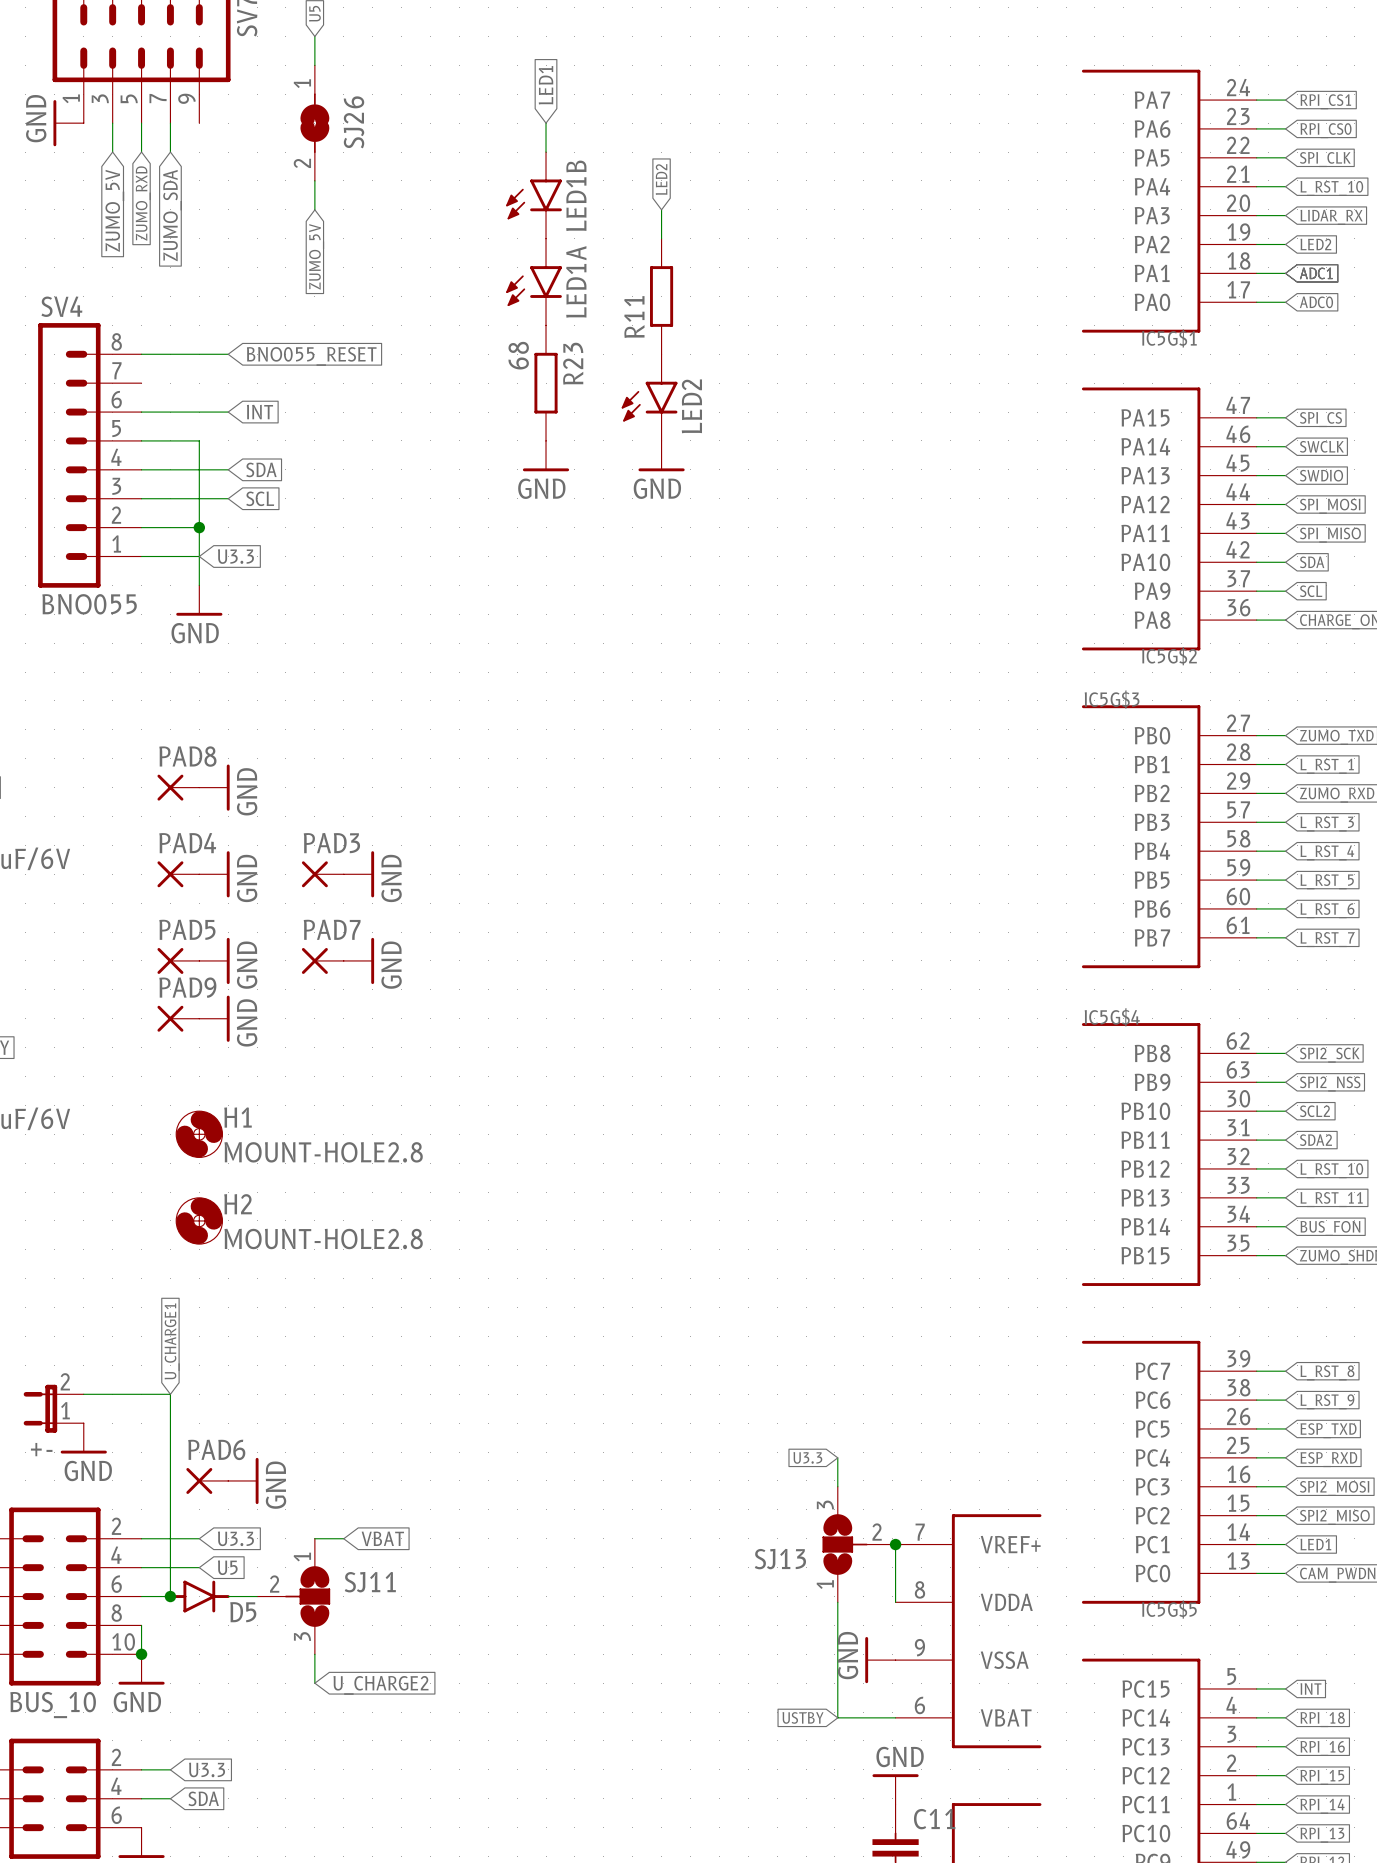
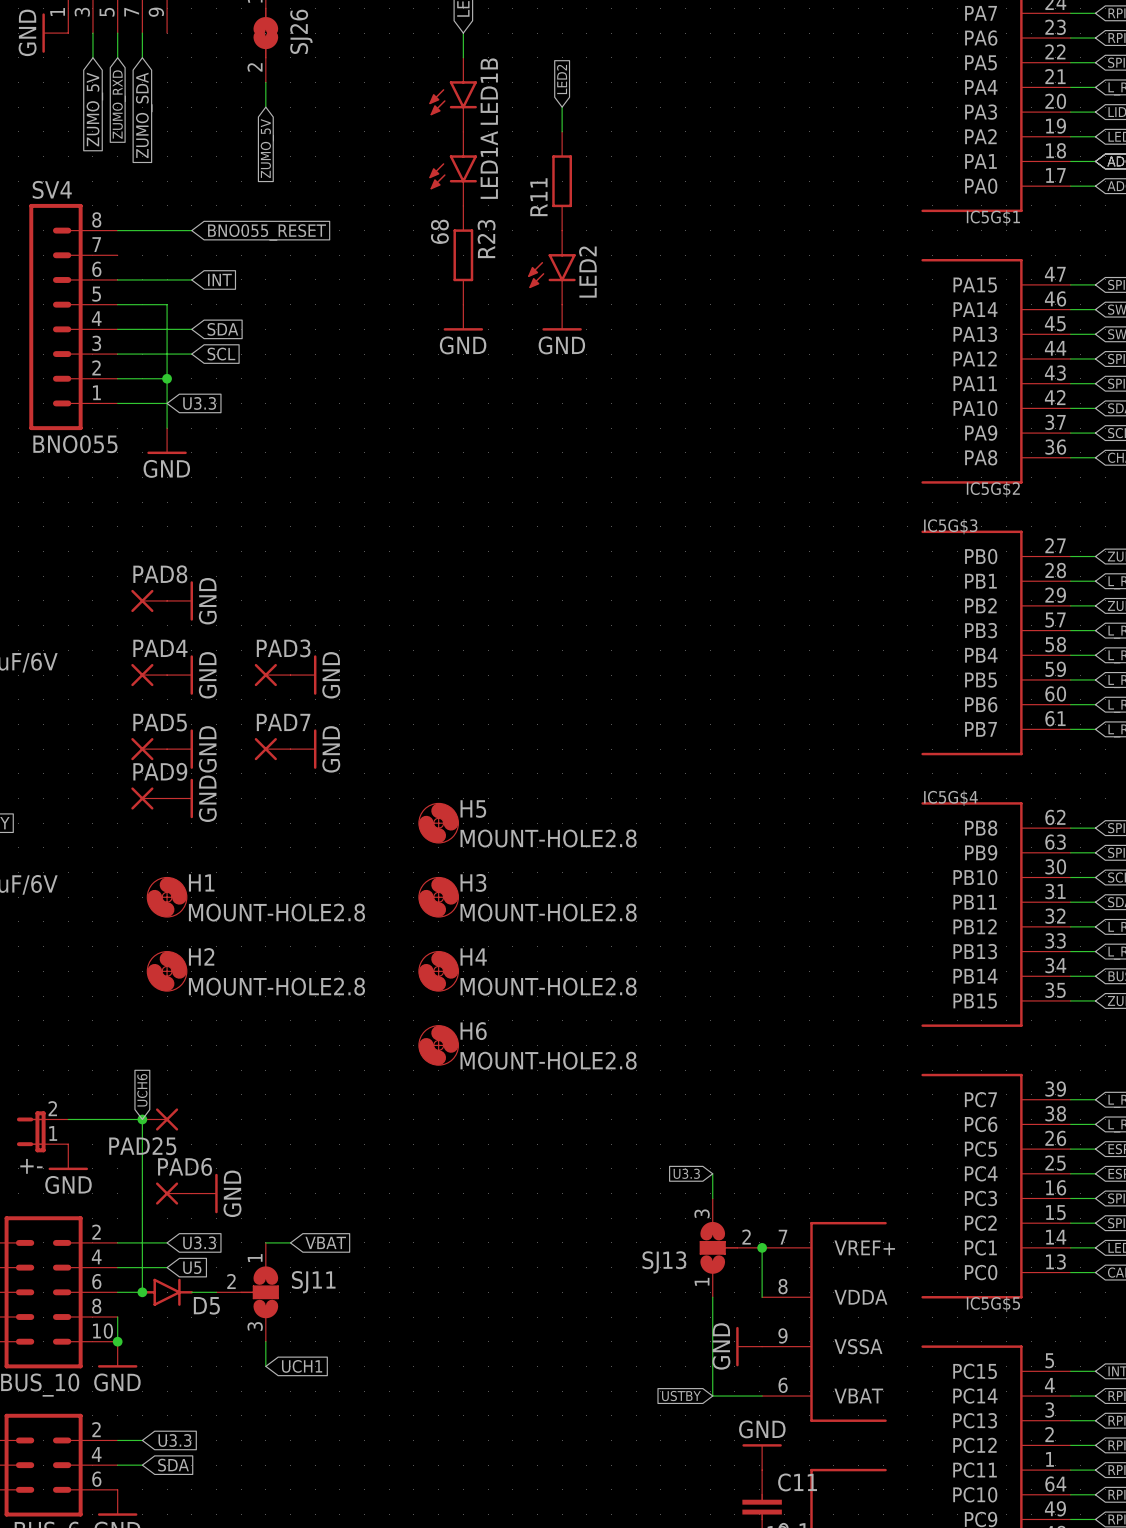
H5: none -> MOUNT-HOLE2.8 (438, 823)
H3: none -> MOUNT-HOLE2.8 (438, 897)
H4: none -> MOUNT-HOLE2.8 (438, 971)
H6: none -> MOUNT-HOLE2.8 (438, 1045)
global label: U_CHARGE1 (172, 1341) -> UCH6 (142, 1090)
junction: none -> (142, 1119)
PAD25: none -> (160, 1119)
global label: U_CHARGE2 (380, 1685) -> UCH1 (302, 1366)

